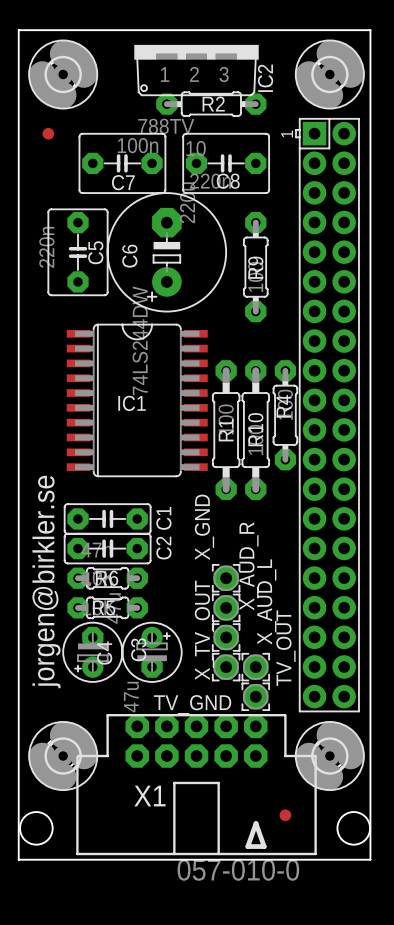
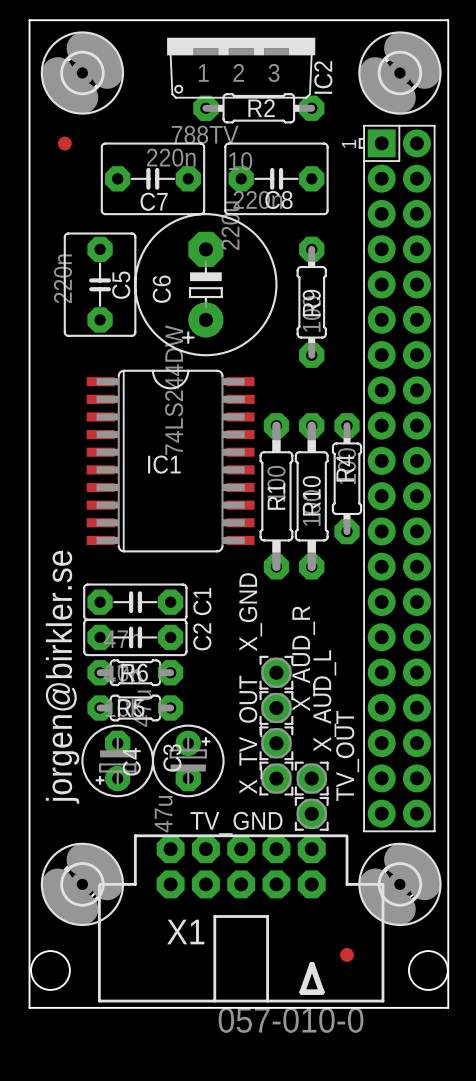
C7 value: 100n (138, 145) -> 220n (171, 157)

